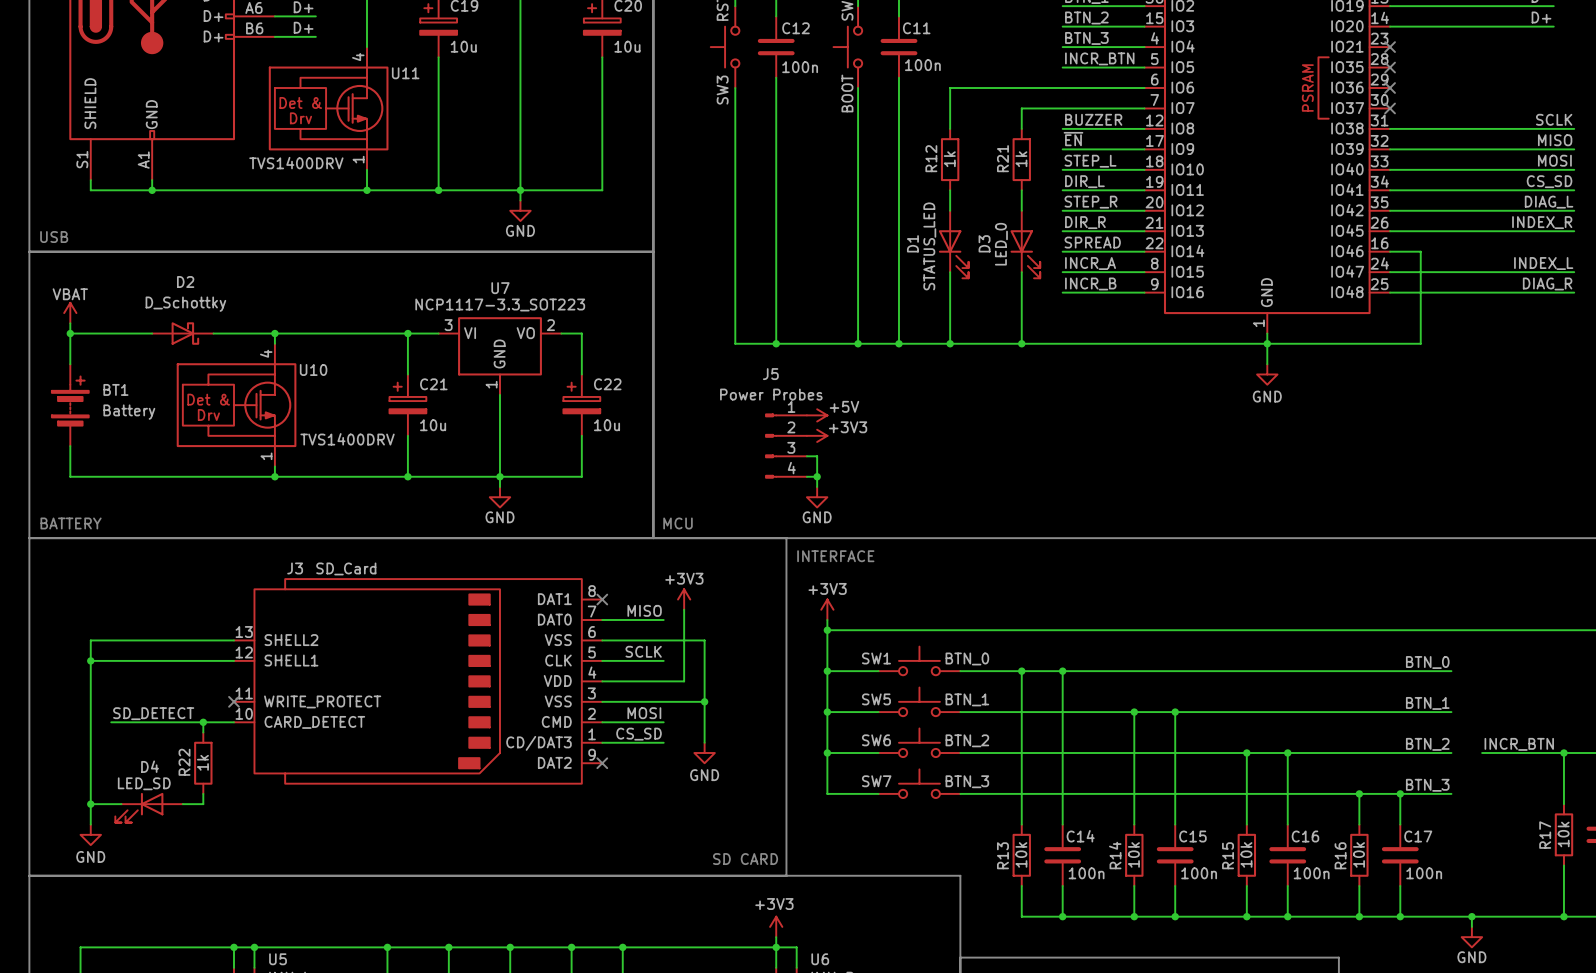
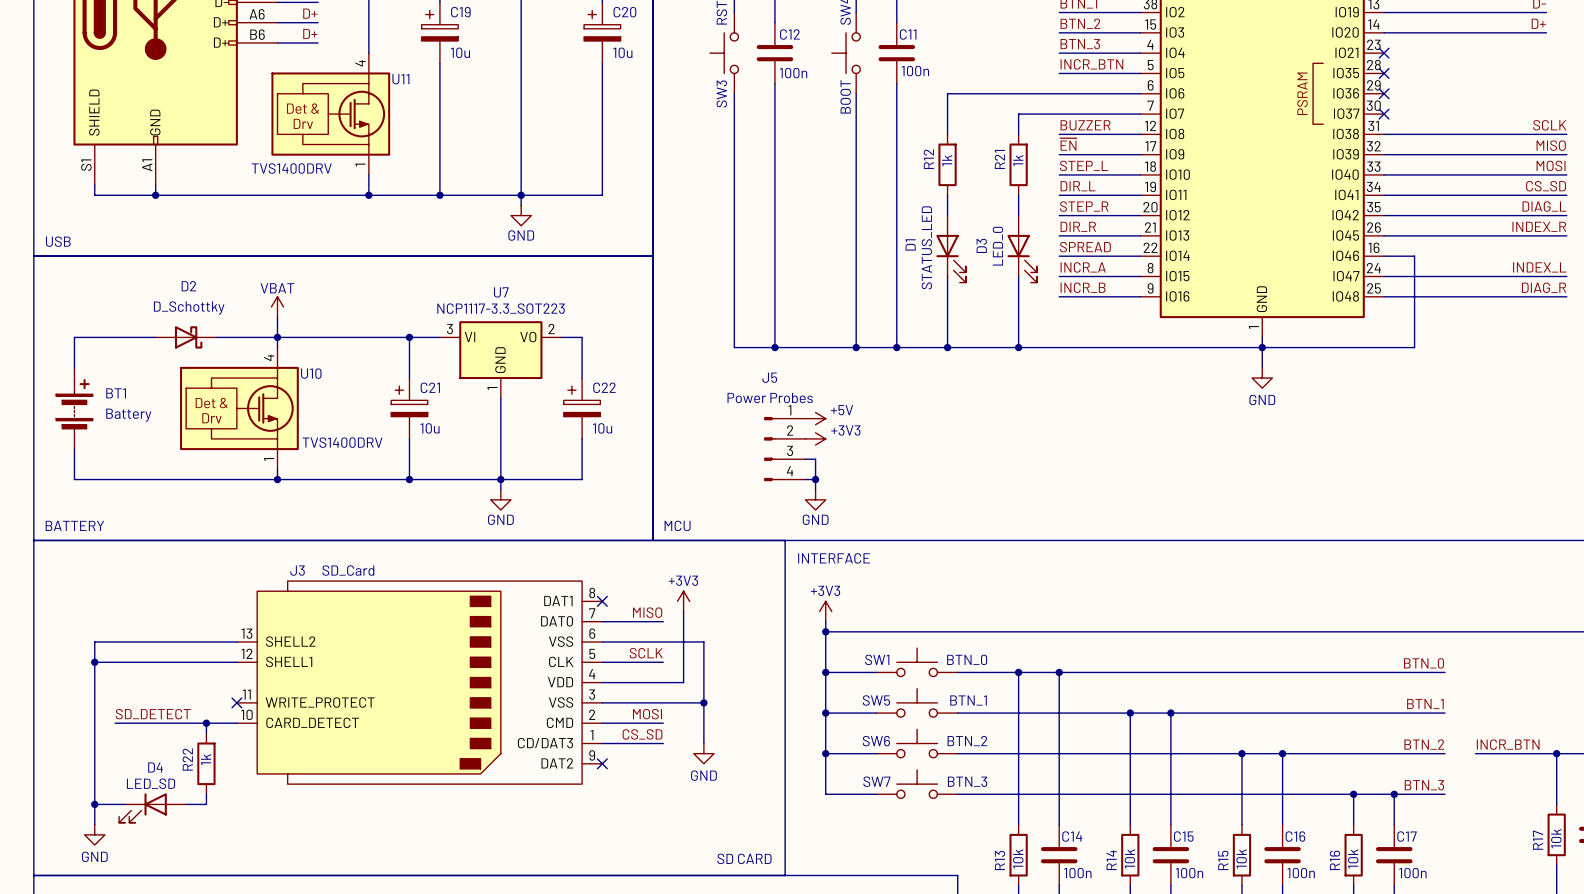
power symbol: none -> VBAT (277, 306)
power symbol: VBAT (70, 313) -> none
wire: none -> (277, 317) (277, 337)
wire: (70, 323) (70, 333) -> none
junction: (70, 333) -> none

